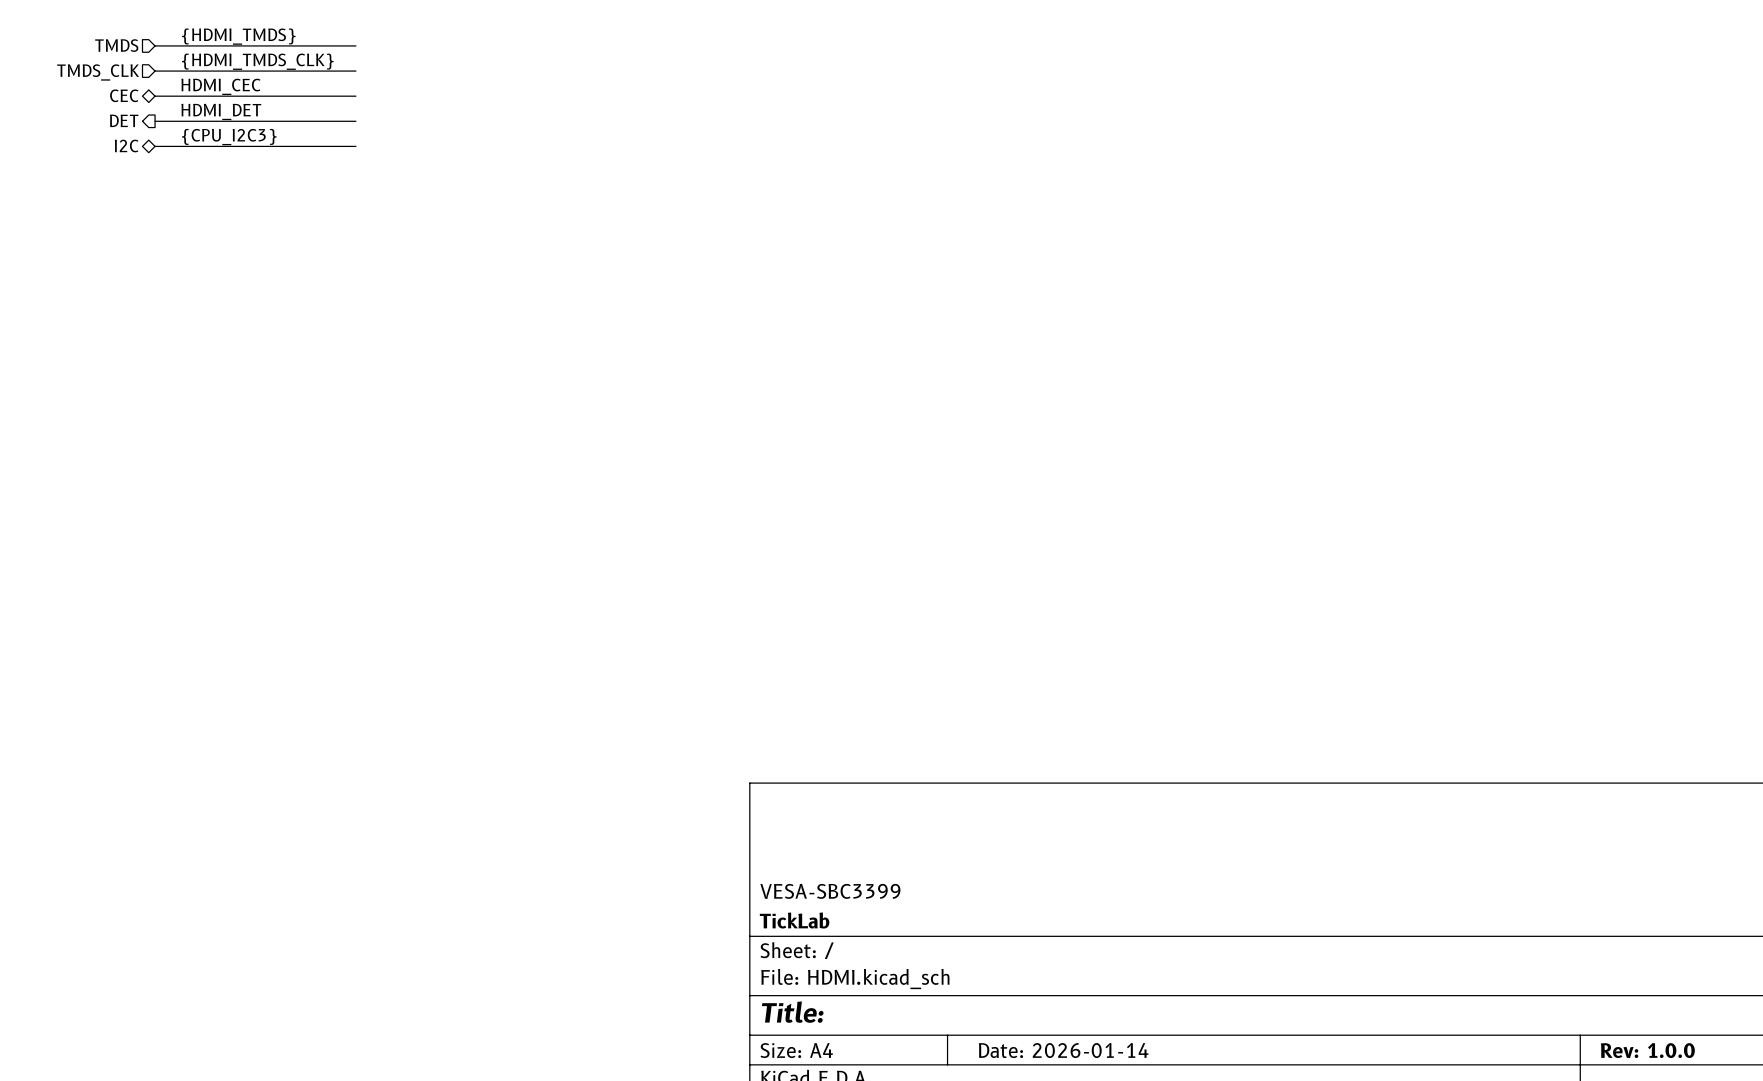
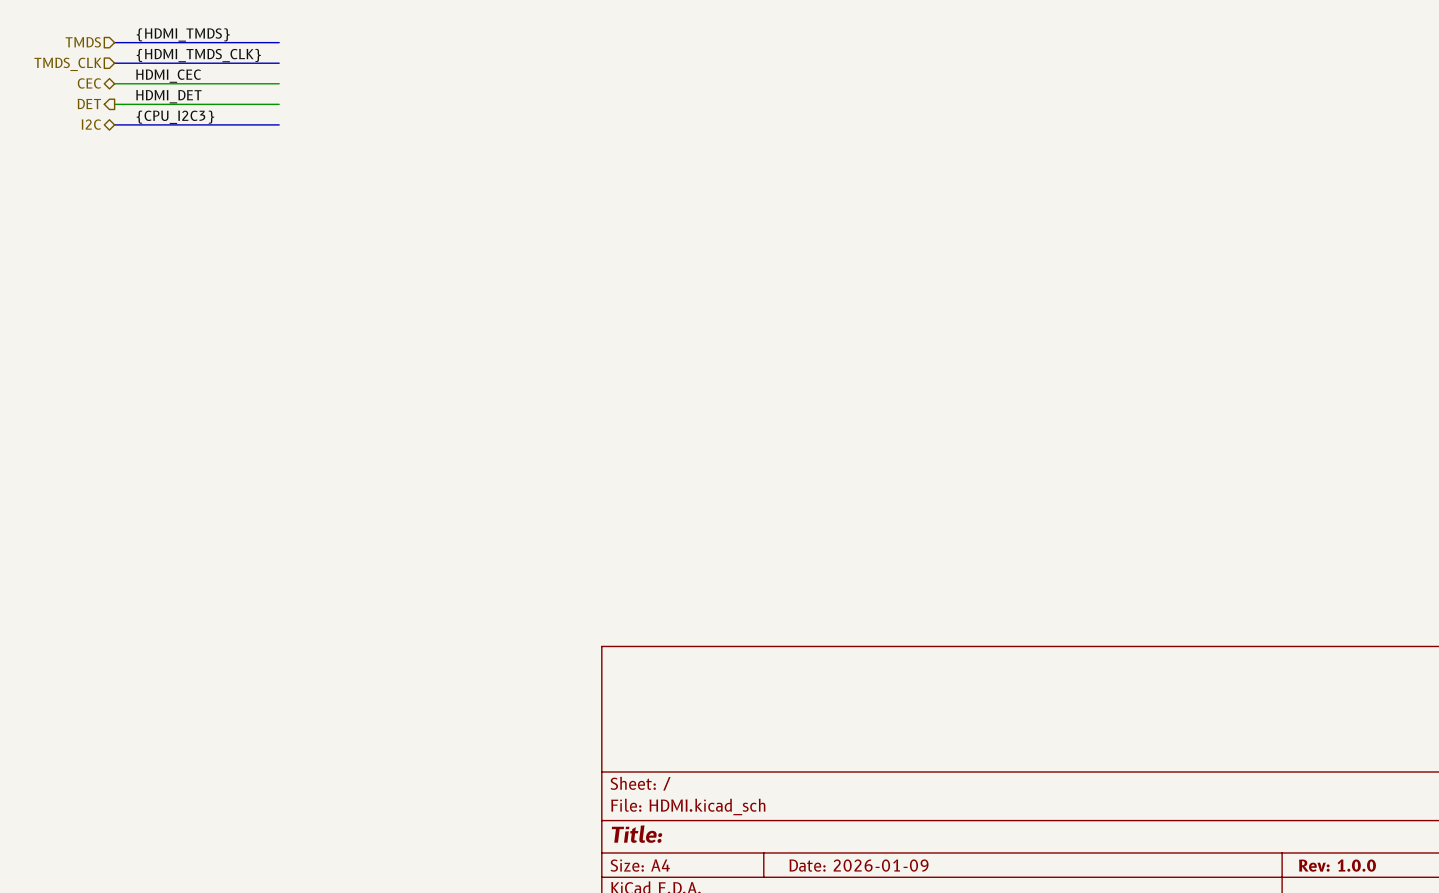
title block: VESA-SBC3399 (830, 891) -> none
title block: TickLab (794, 920) -> none
title block: Date: 2026-01-14 (1063, 1050) -> Date: 2026-01-09 (858, 865)

